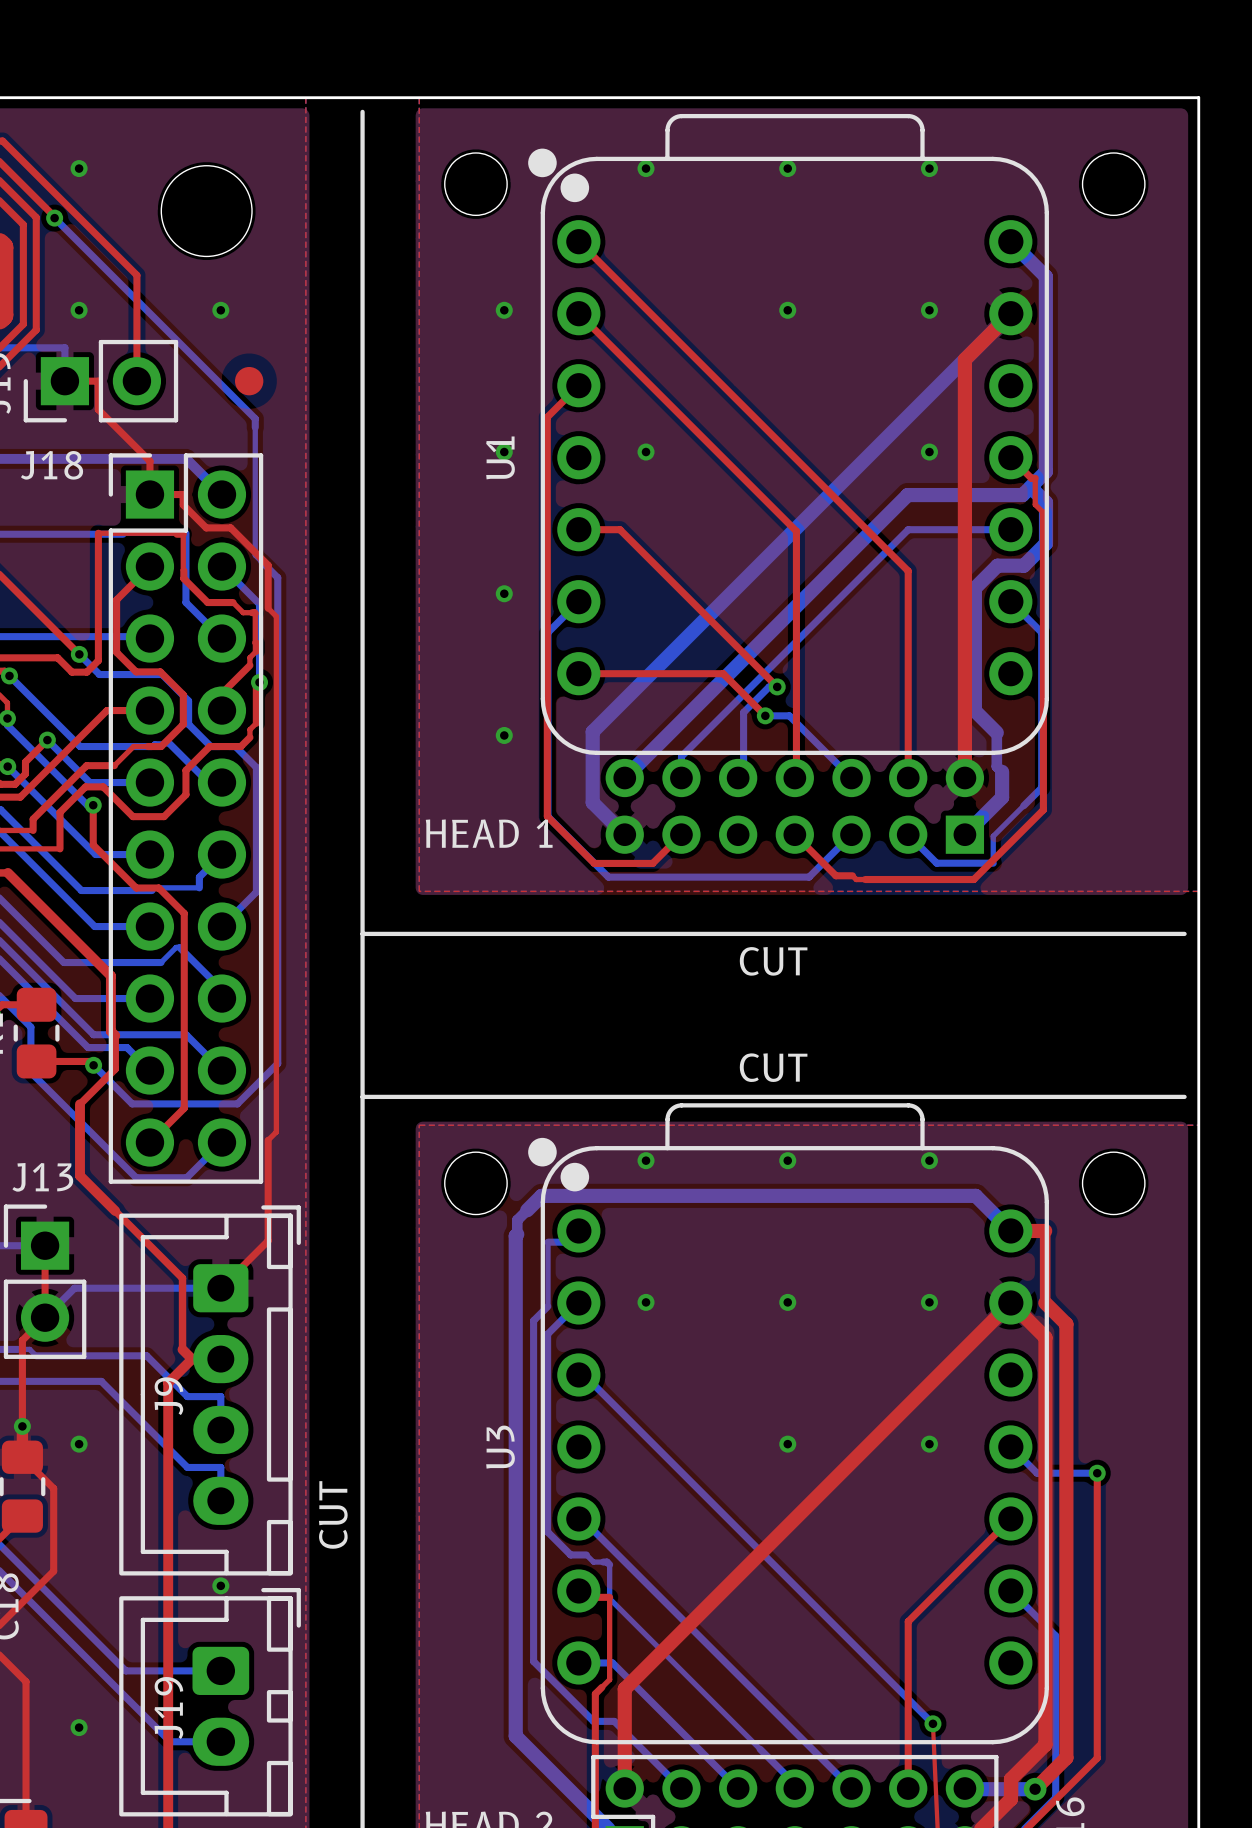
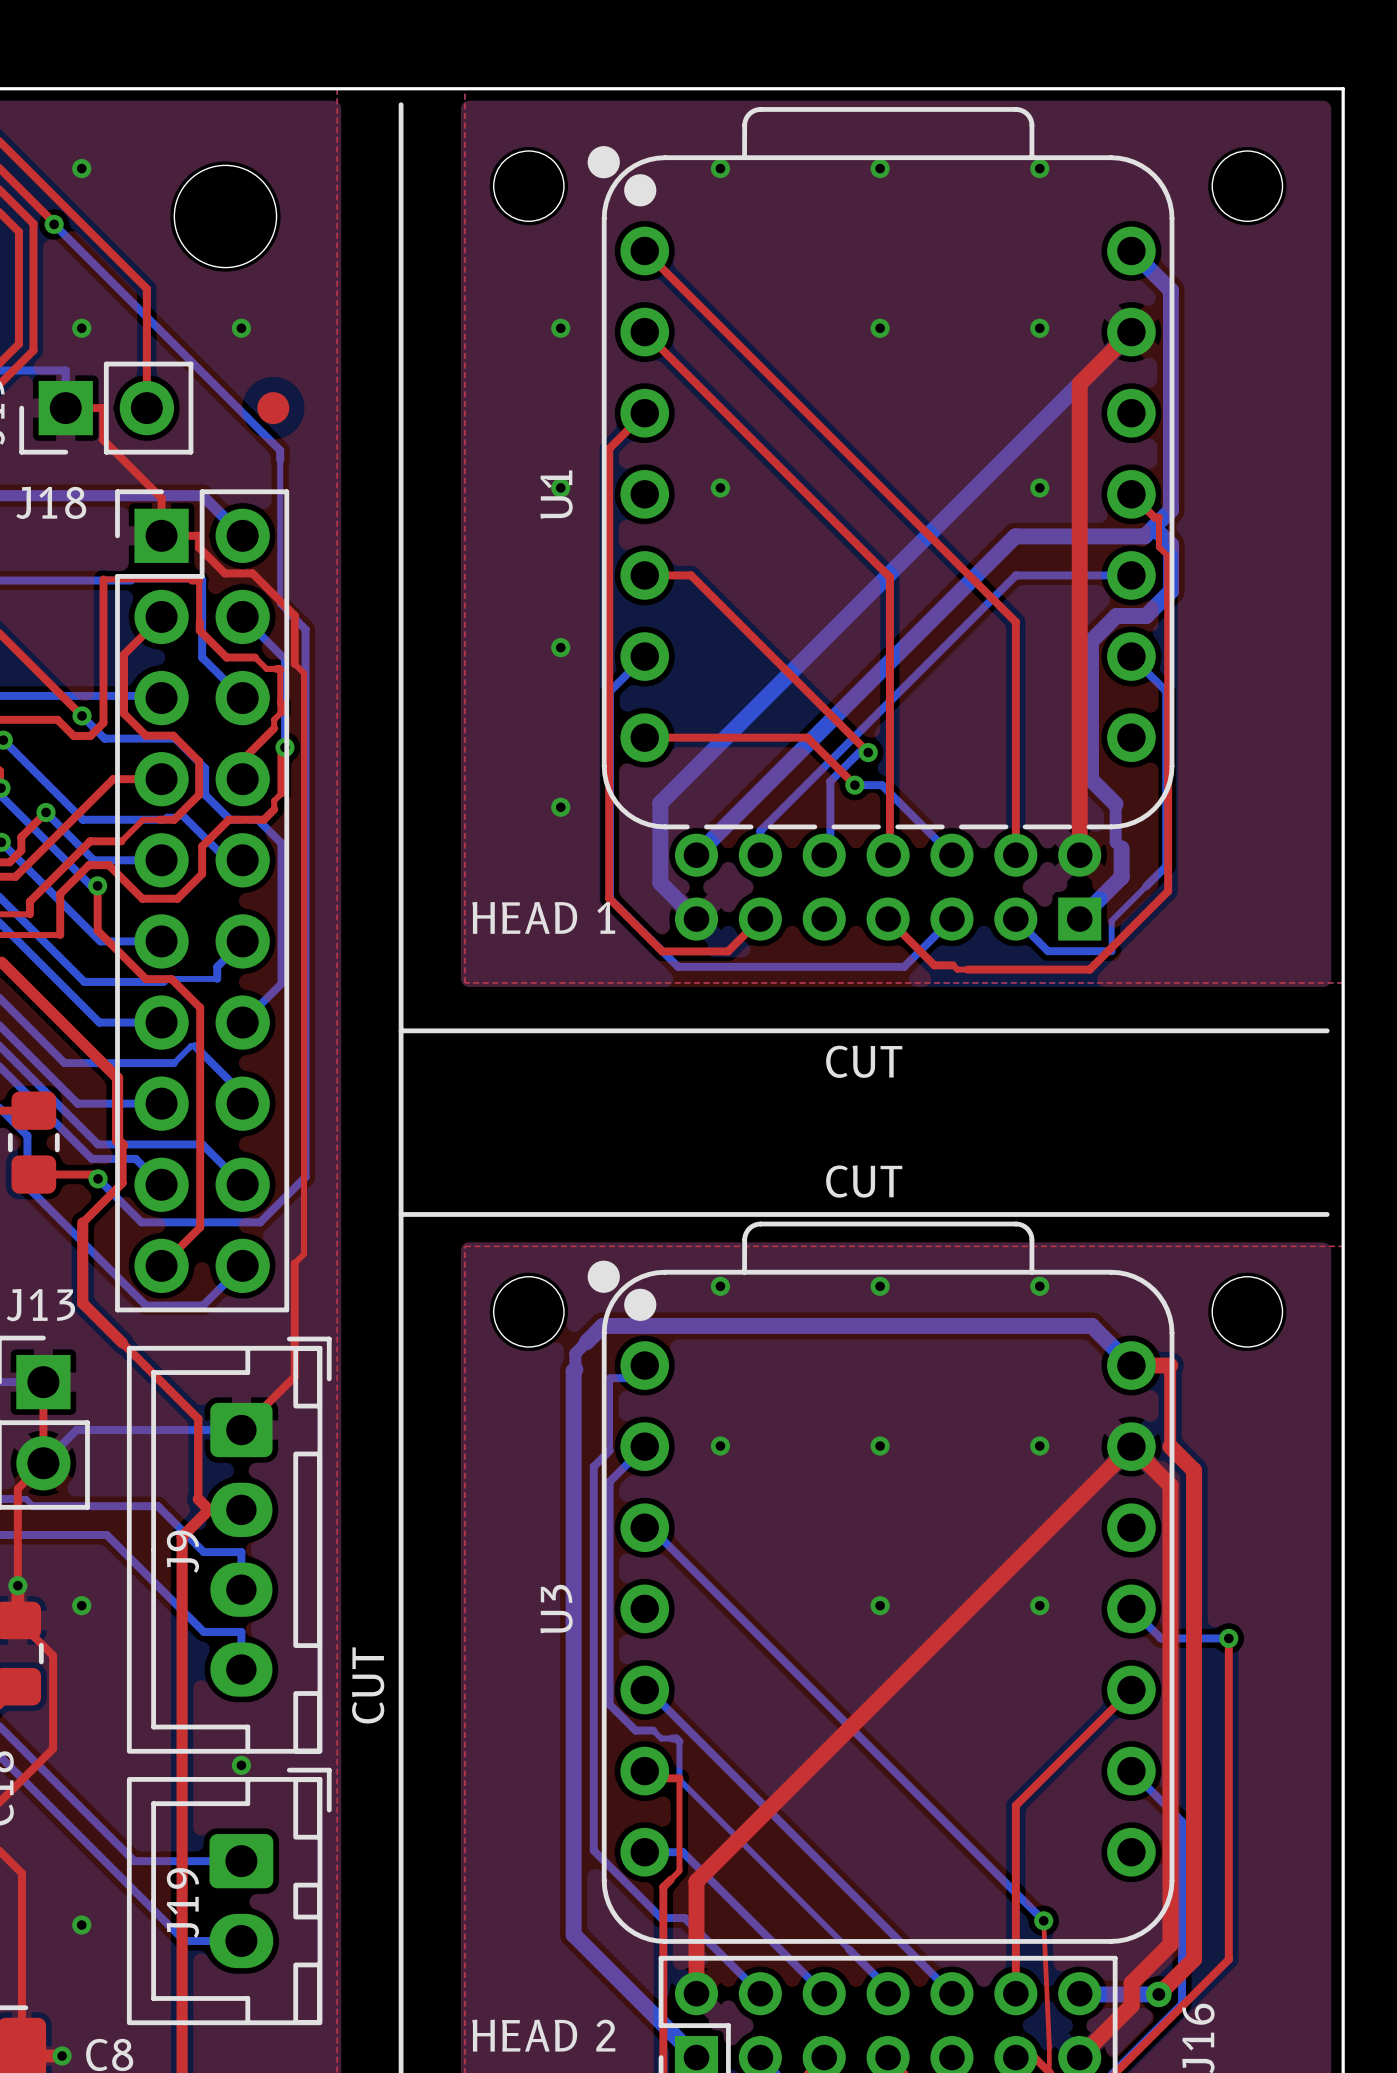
U1 footprint: [528, 113, 1049, 756] -> [587, 107, 1175, 830]

